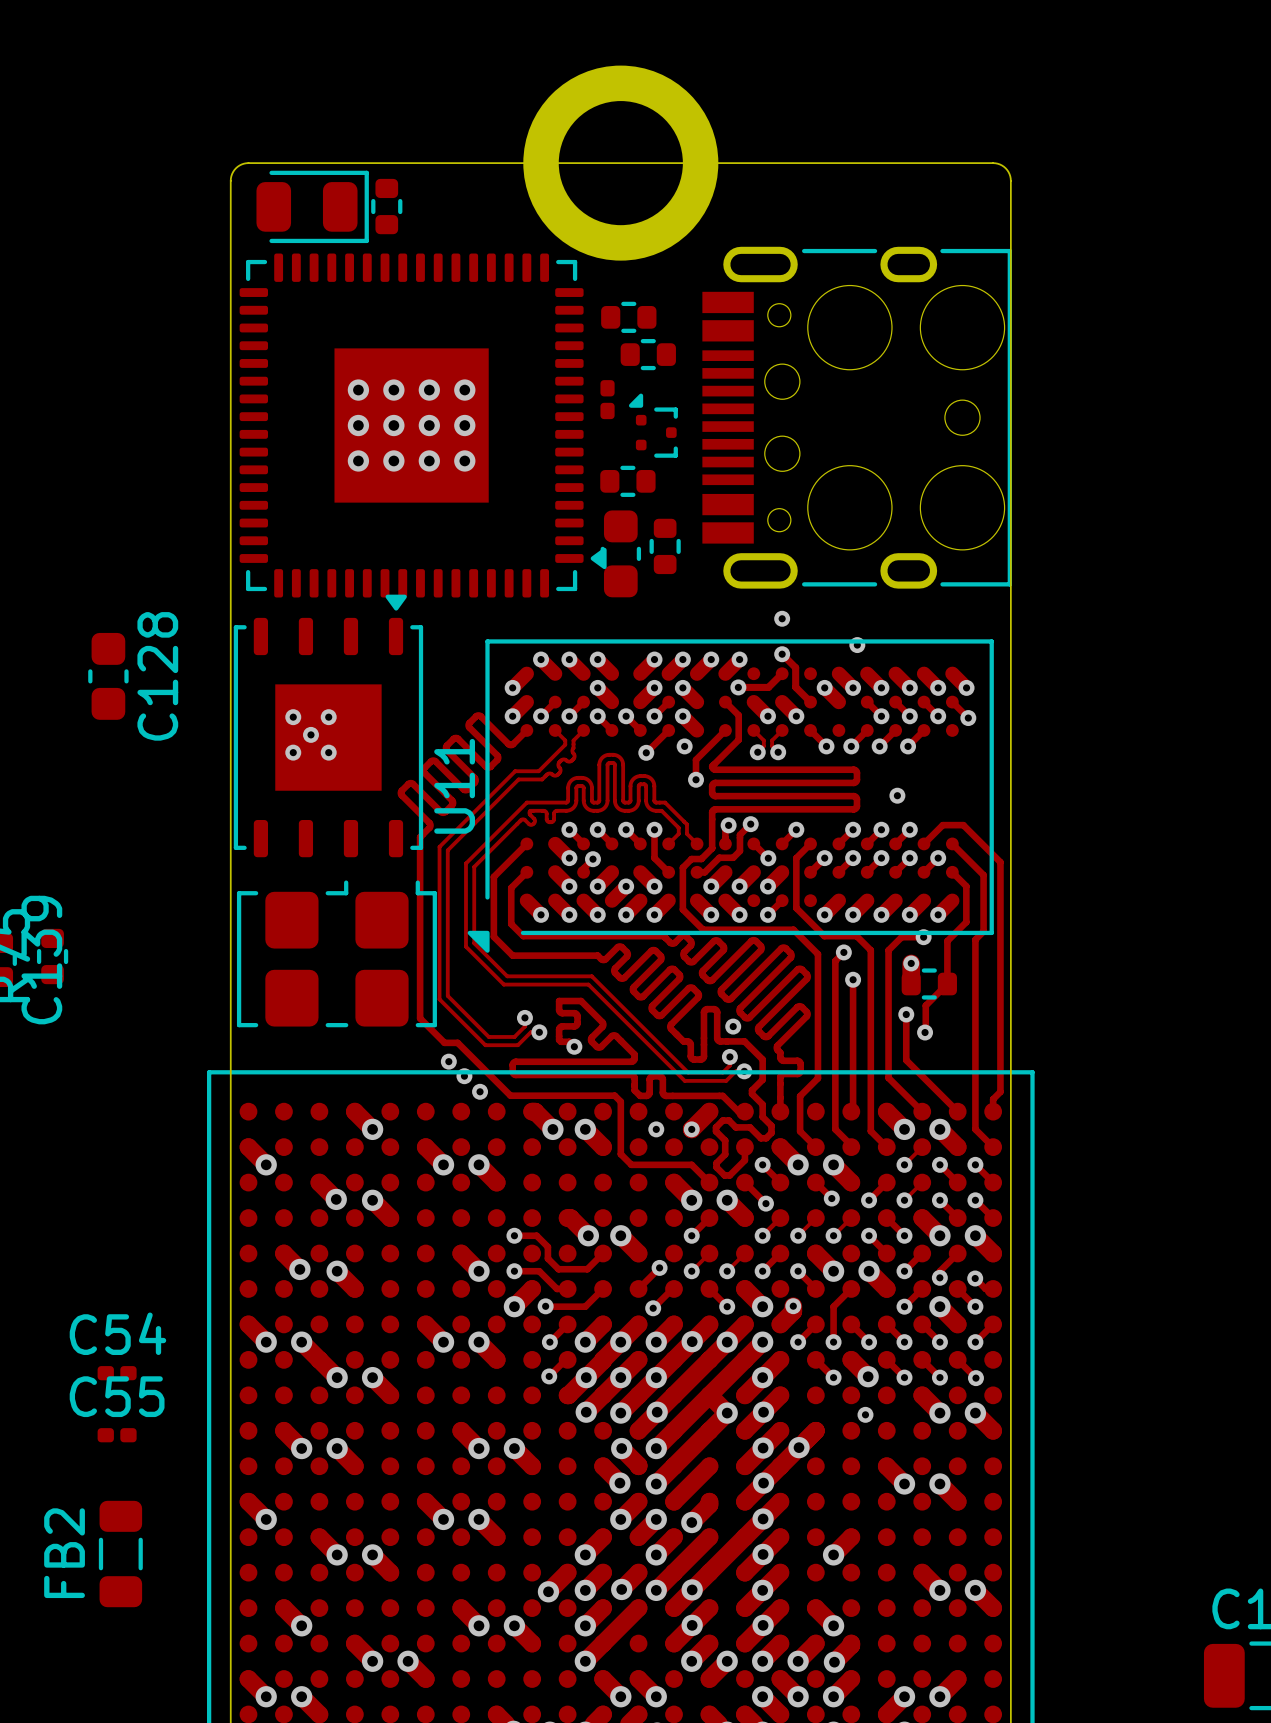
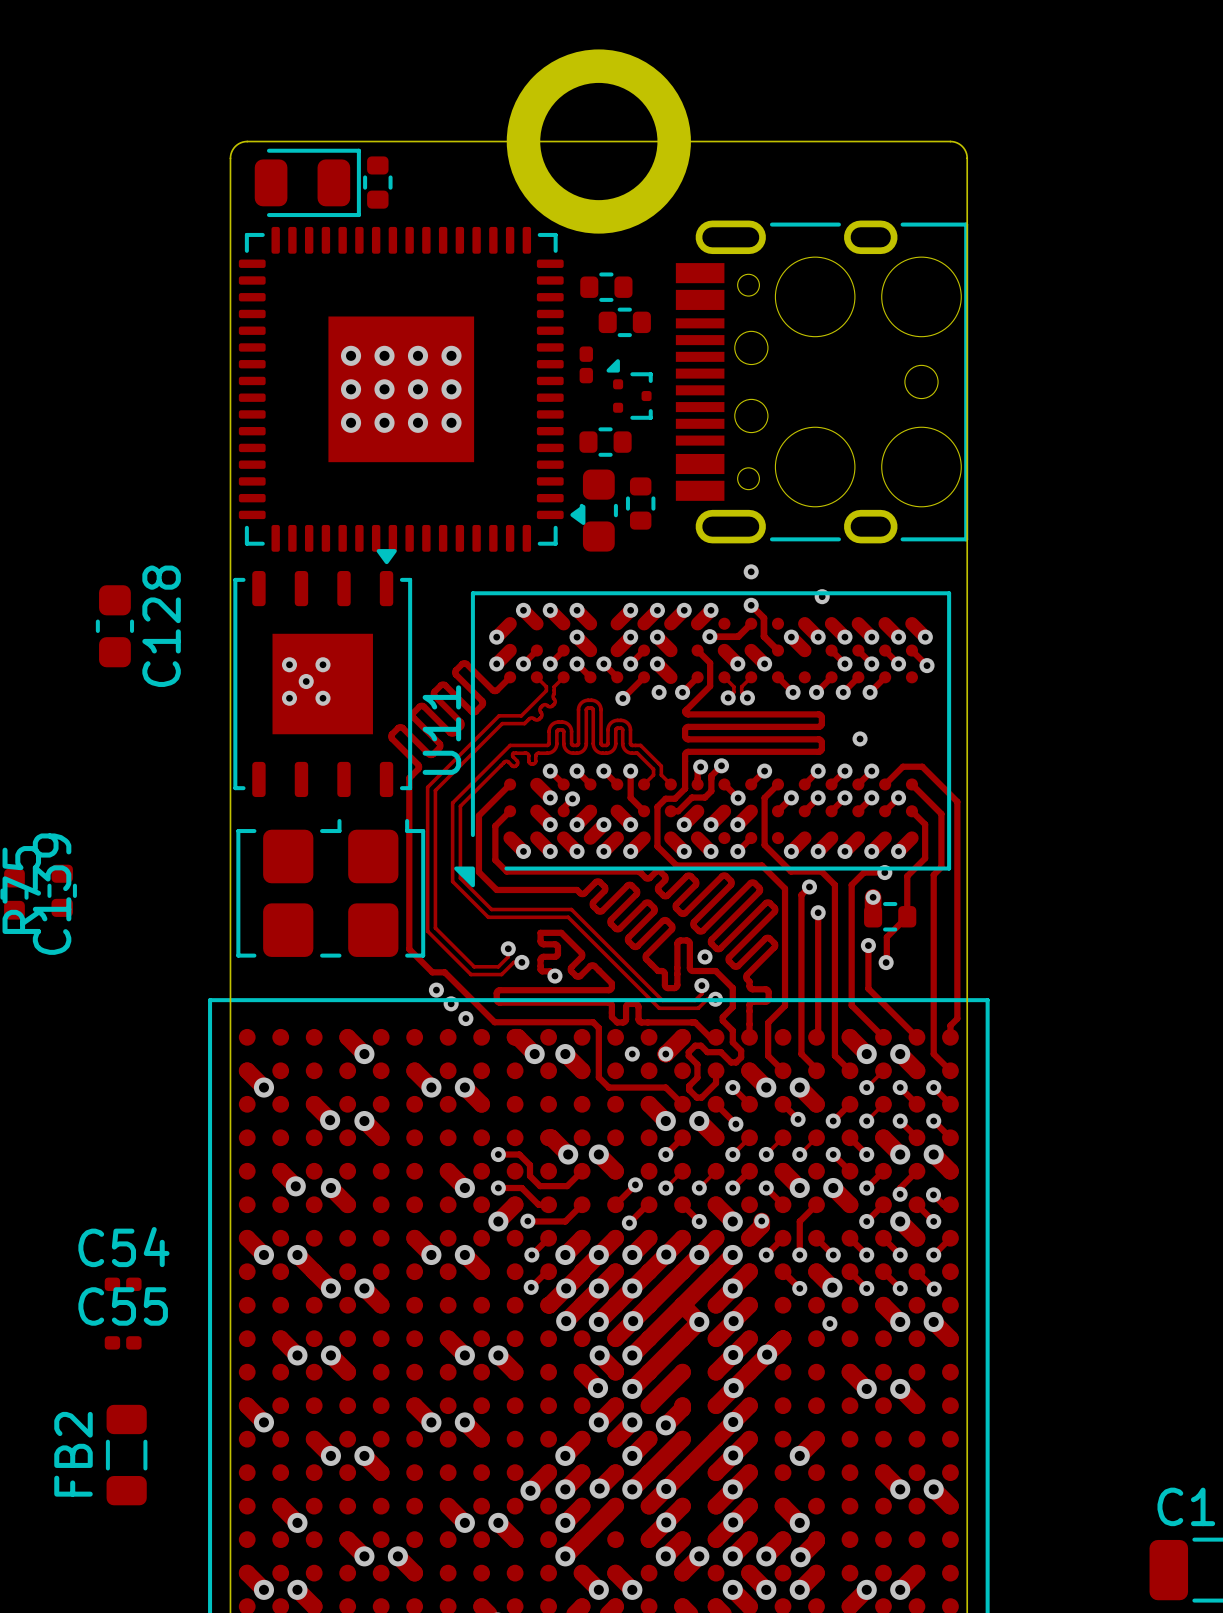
track: (709, 746) (695, 759) (695, 779) -> none
via position: (696, 779) -> (682, 692)

